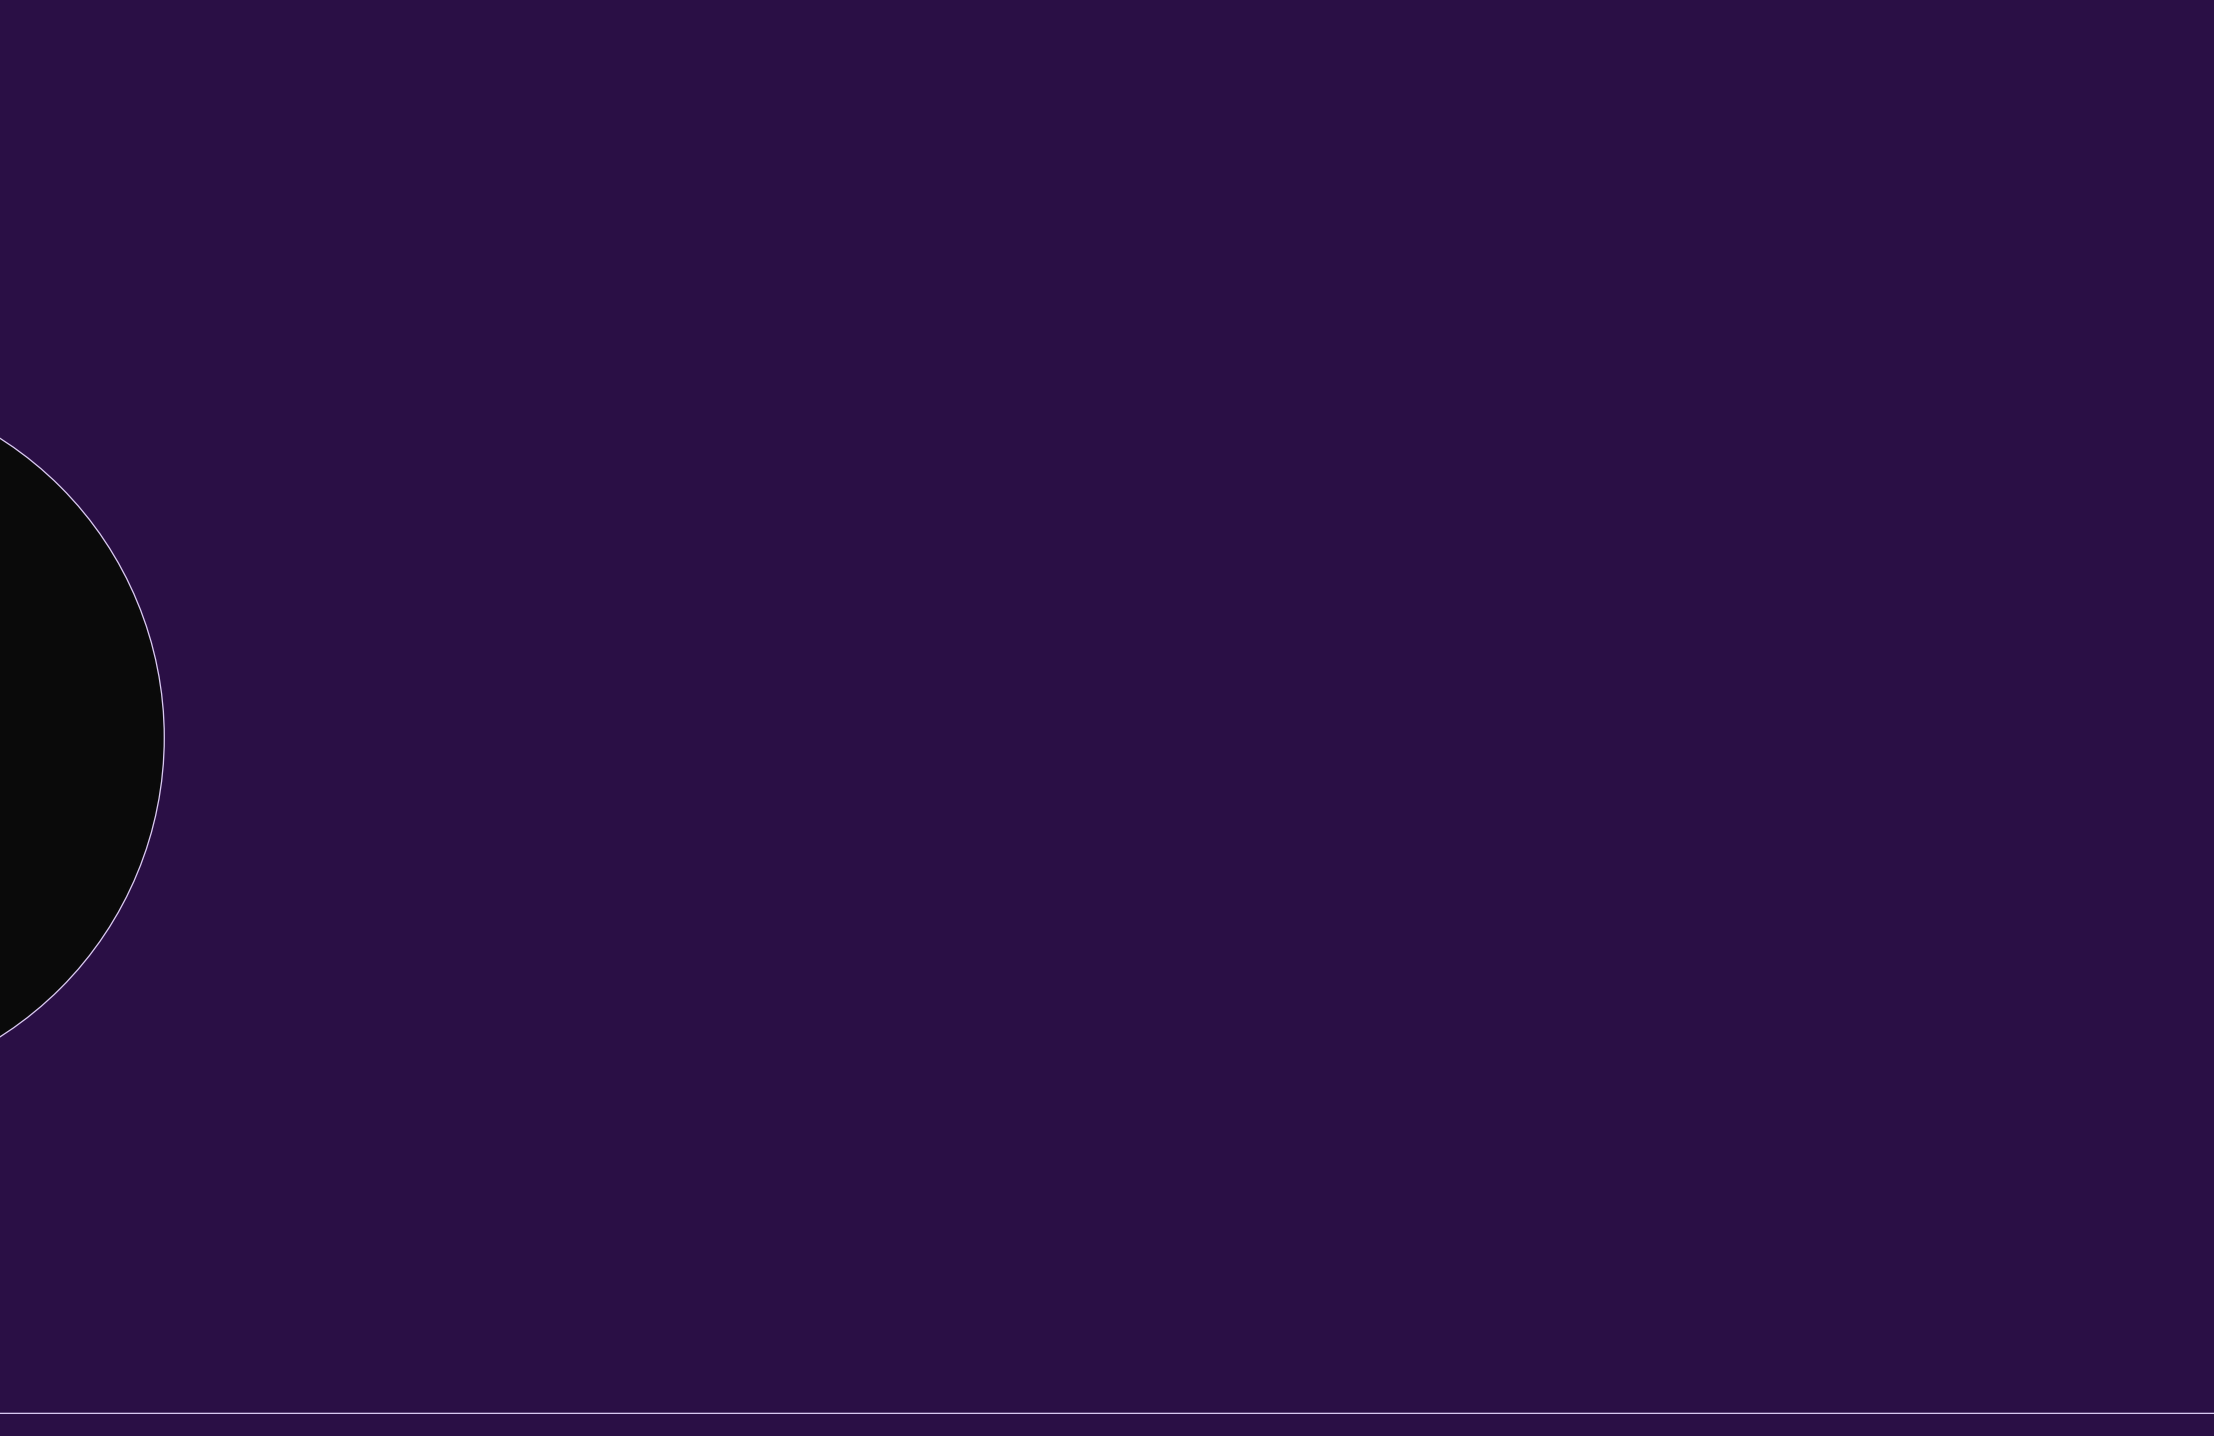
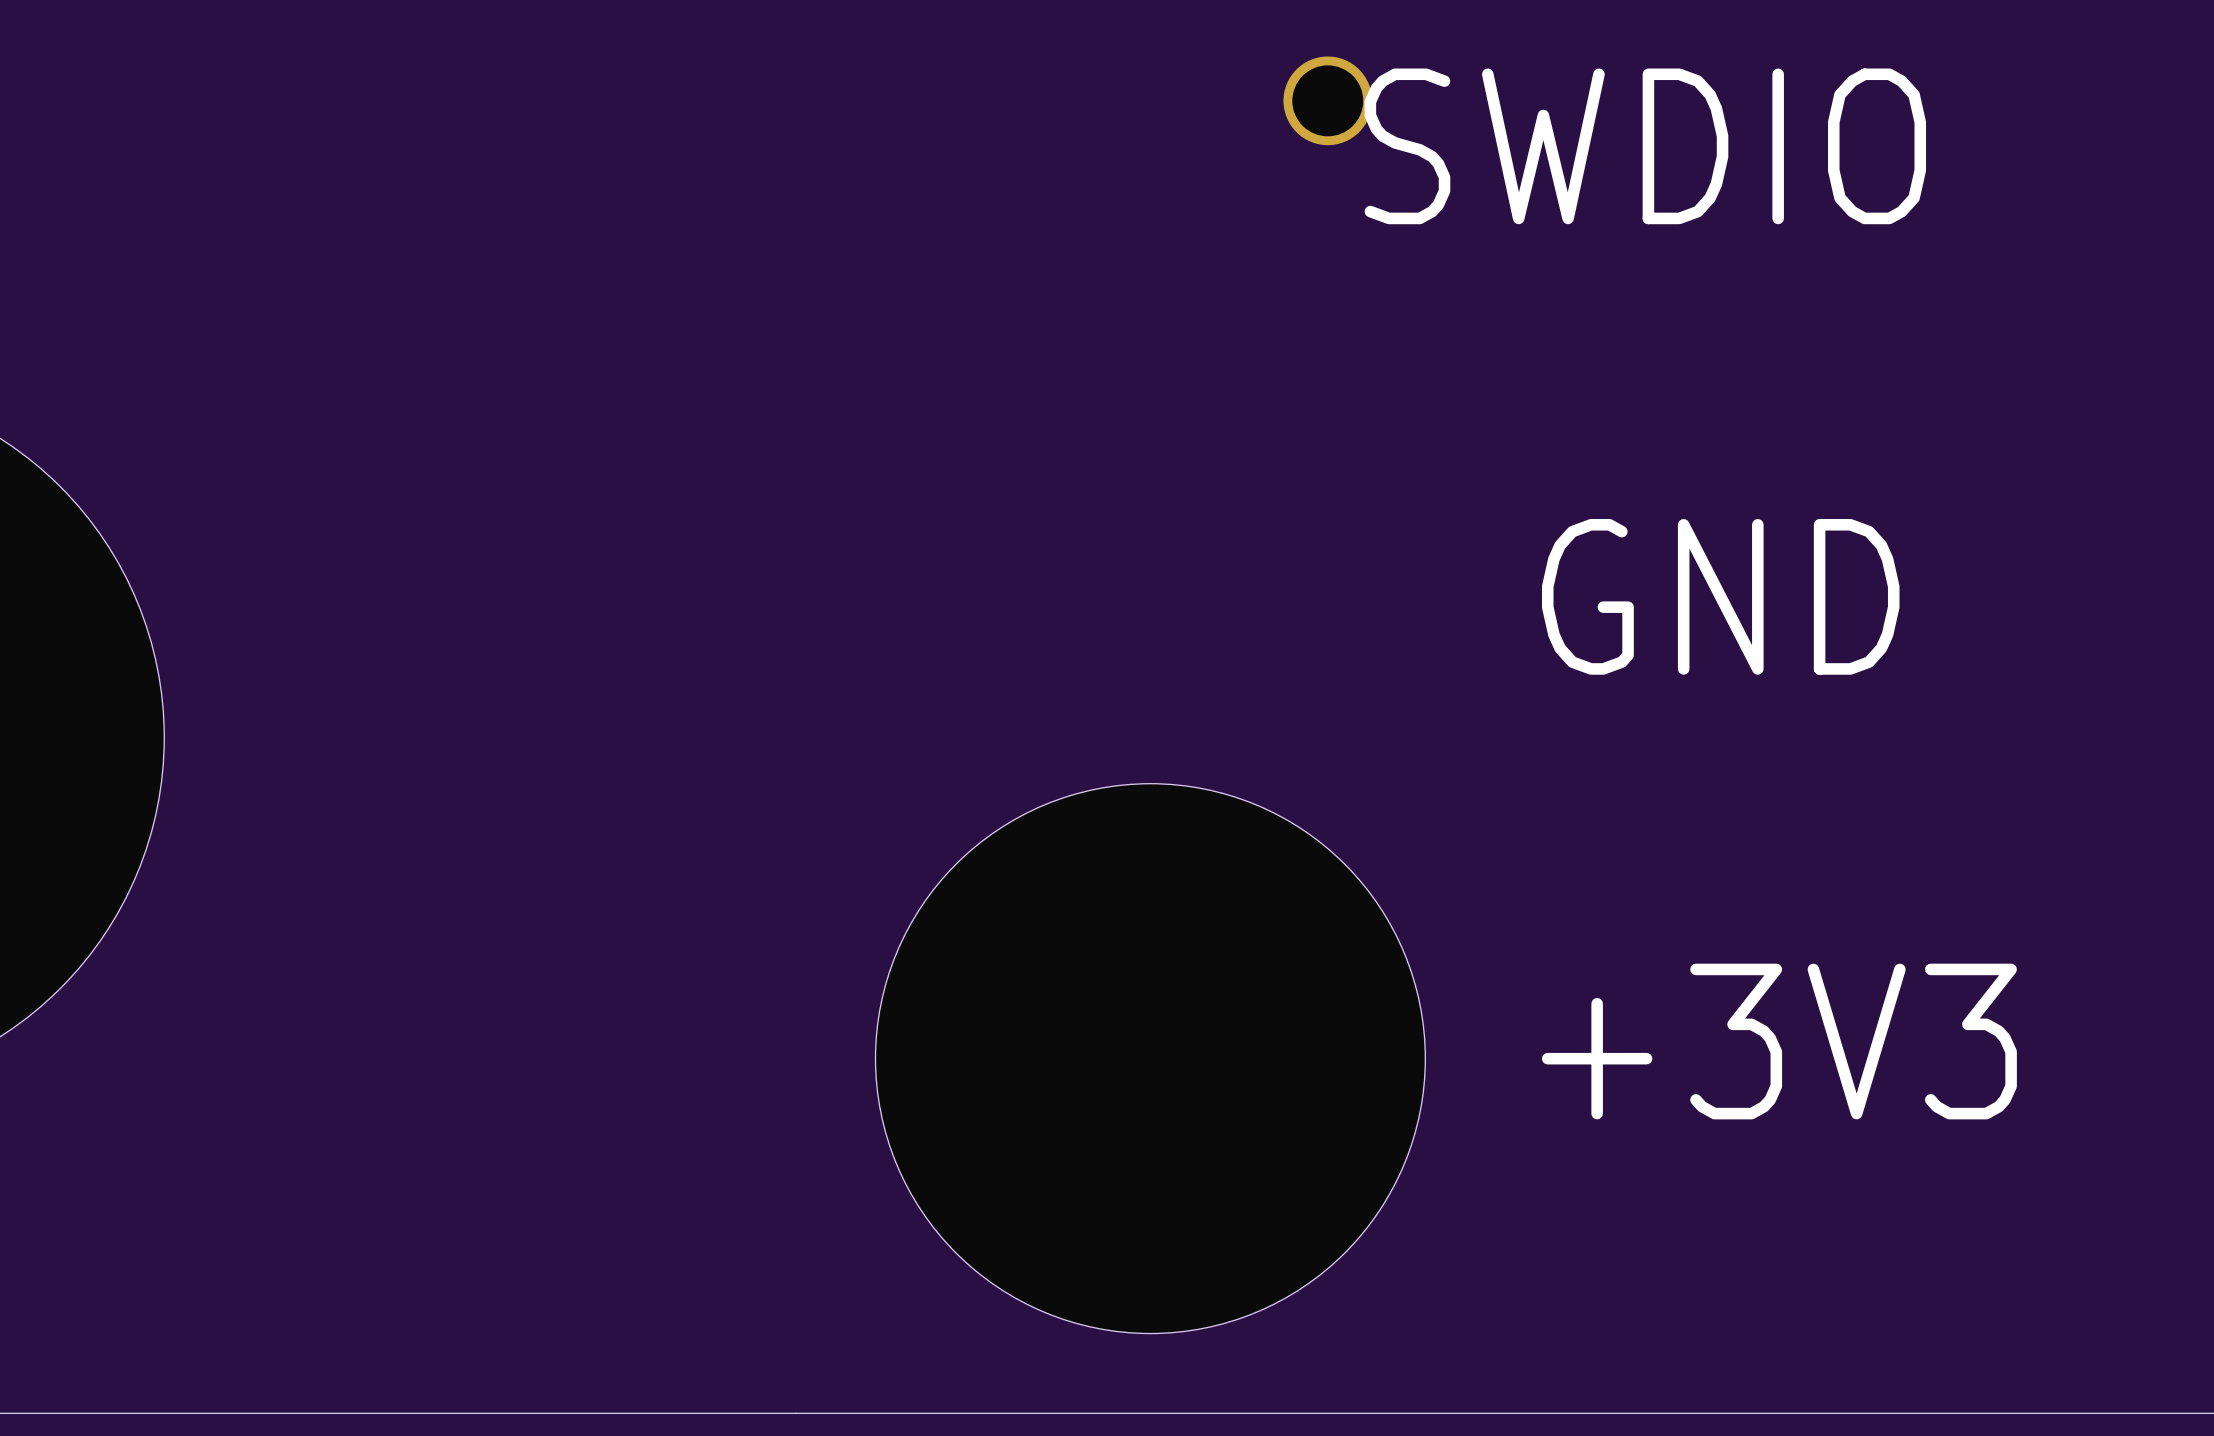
via: none -> (1327, 100)
text: none -> SWDIO (1645, 146)
text: none -> GND (1720, 596)
text: none -> +3V3 (1779, 1041)
hole: none -> (1150, 1058)

